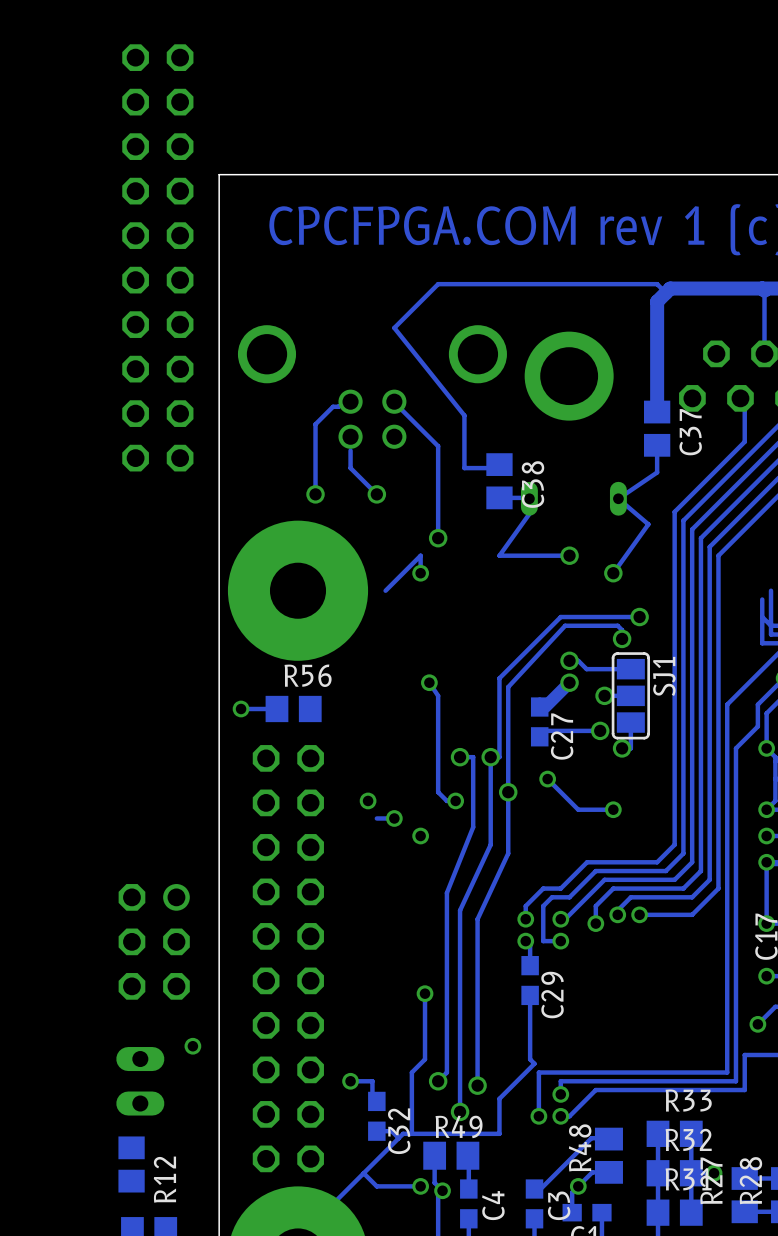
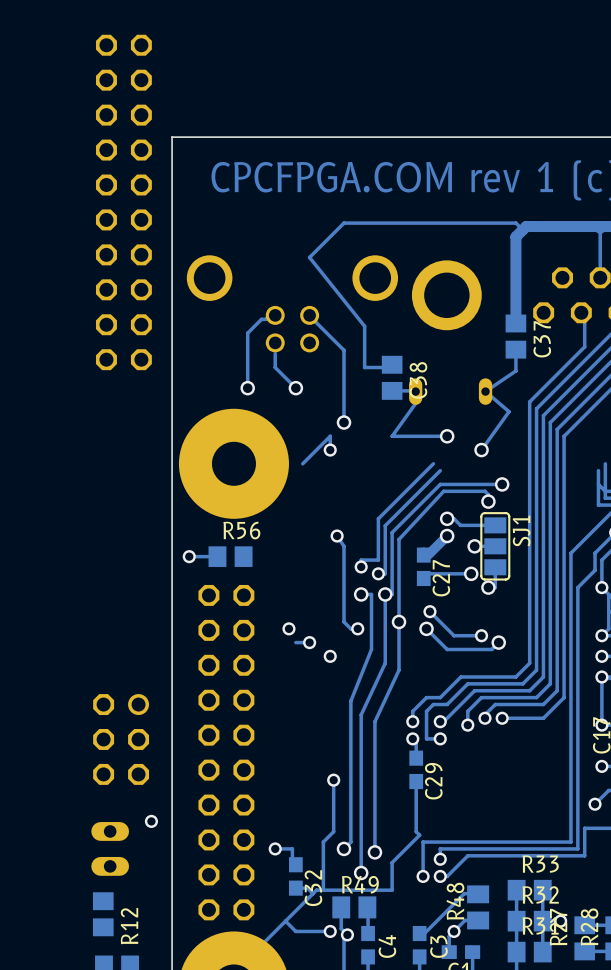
track: none -> (433, 463) (378, 518) (378, 560) (361, 560) (361, 566)
track: none -> (440, 470) (385, 525) (385, 573) (378, 573)
via: none -> (361, 566)
via: none -> (378, 573)
track: none -> (426, 628) (447, 649) (491, 649) (498, 642)
via: none -> (426, 628)
via: none -> (498, 642)

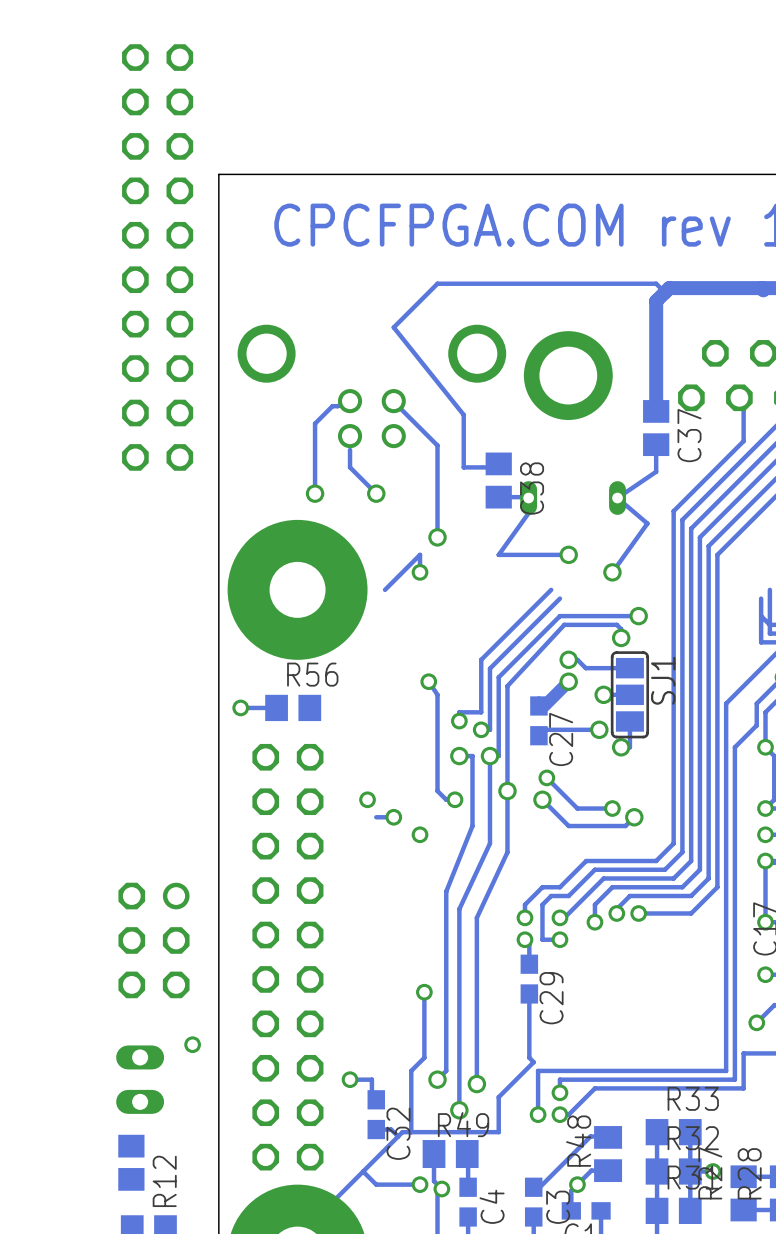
track: (600, 228) (600, 277) -> none

